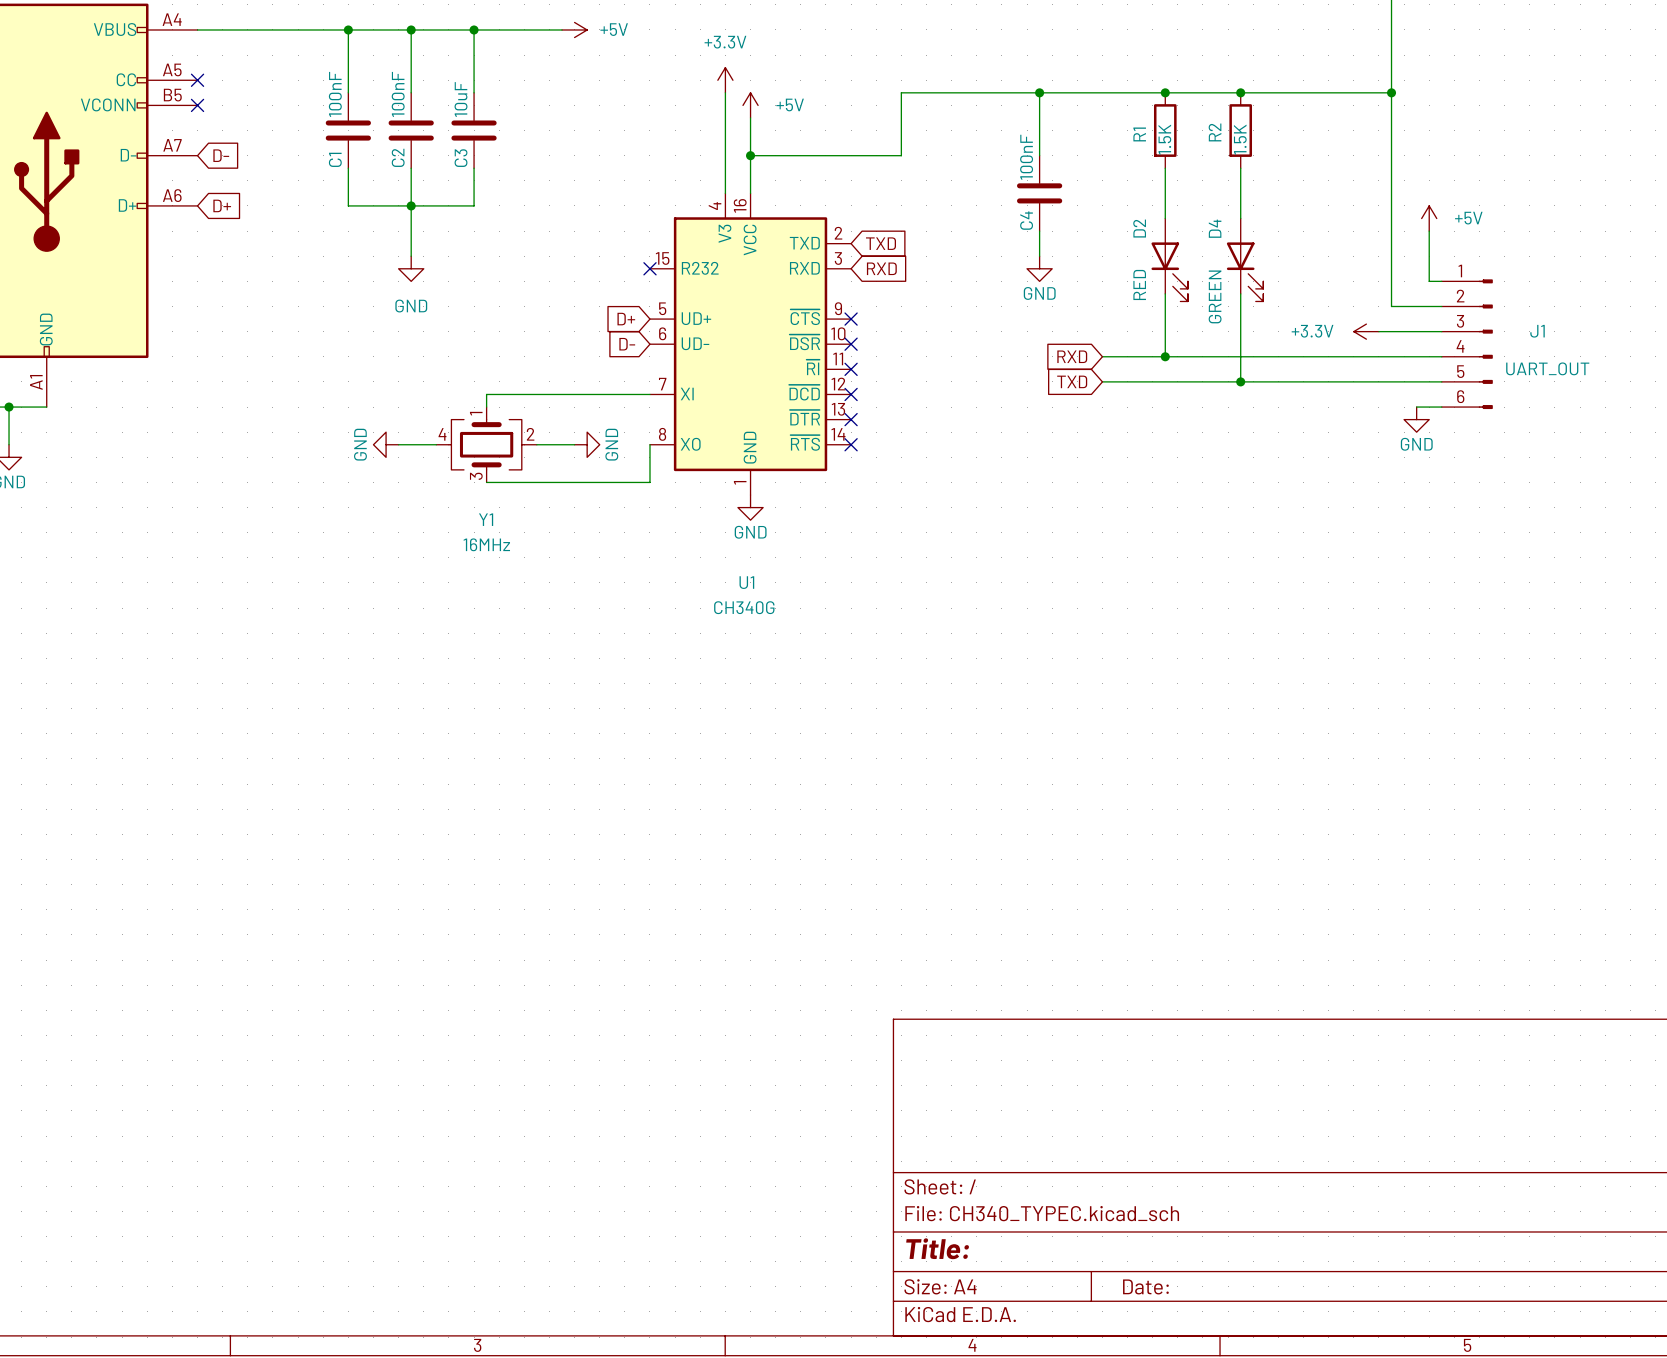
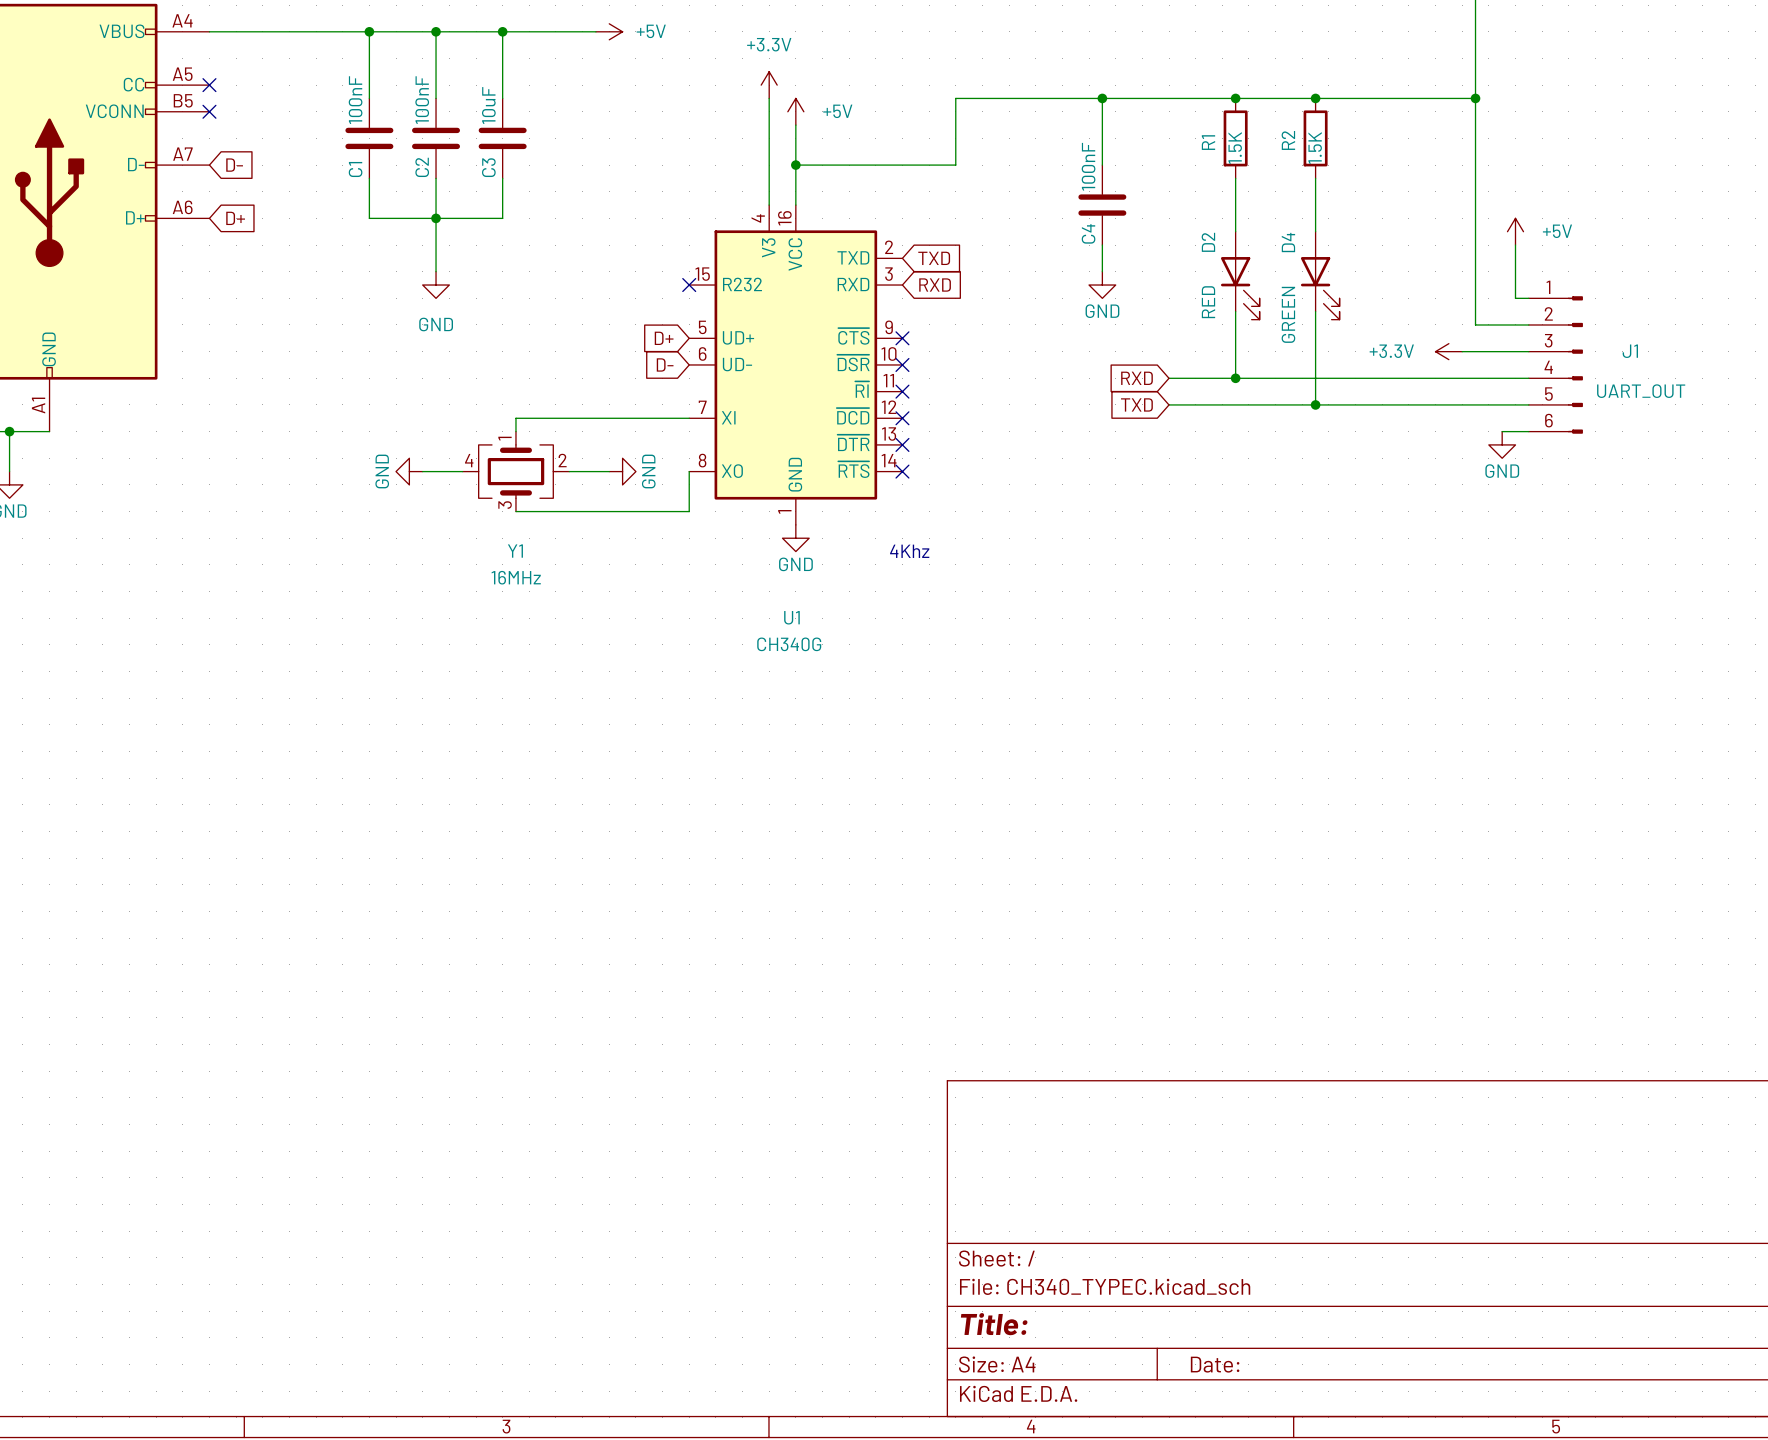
text: none -> 4Khz (909, 551)

